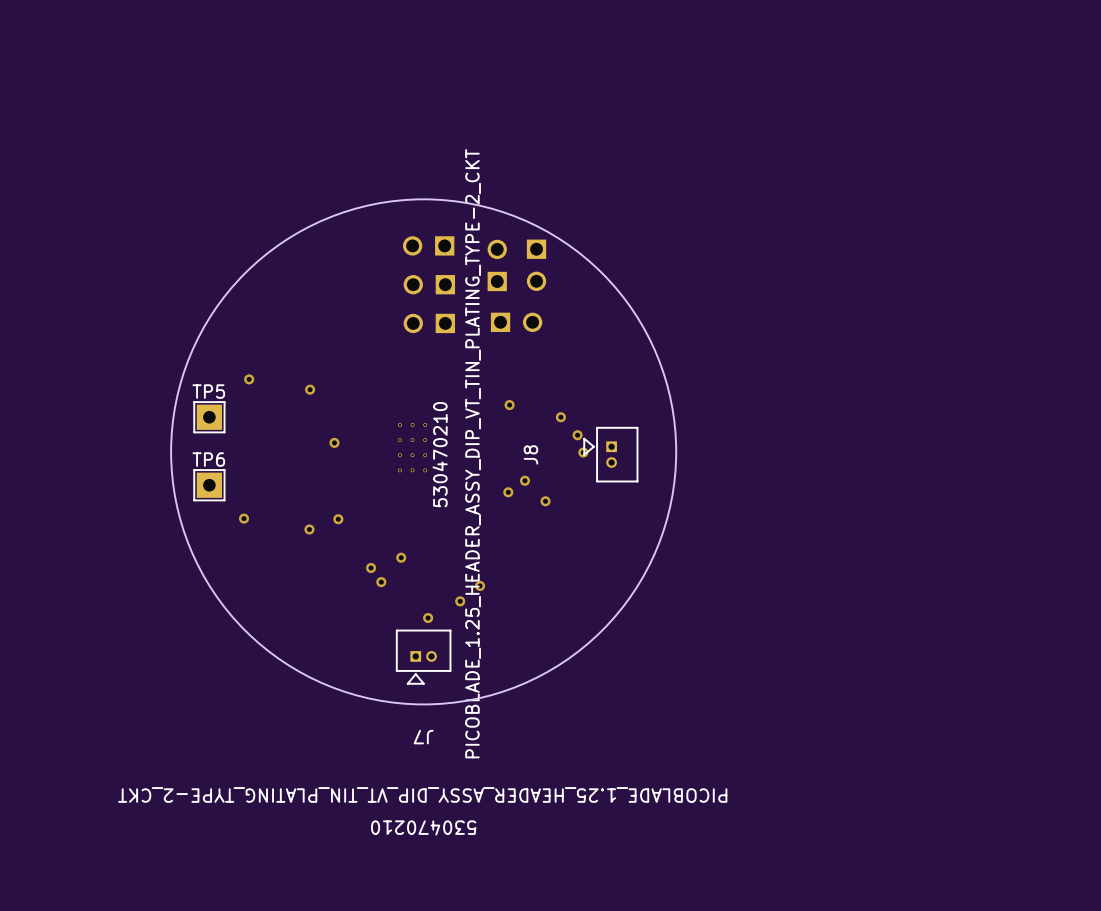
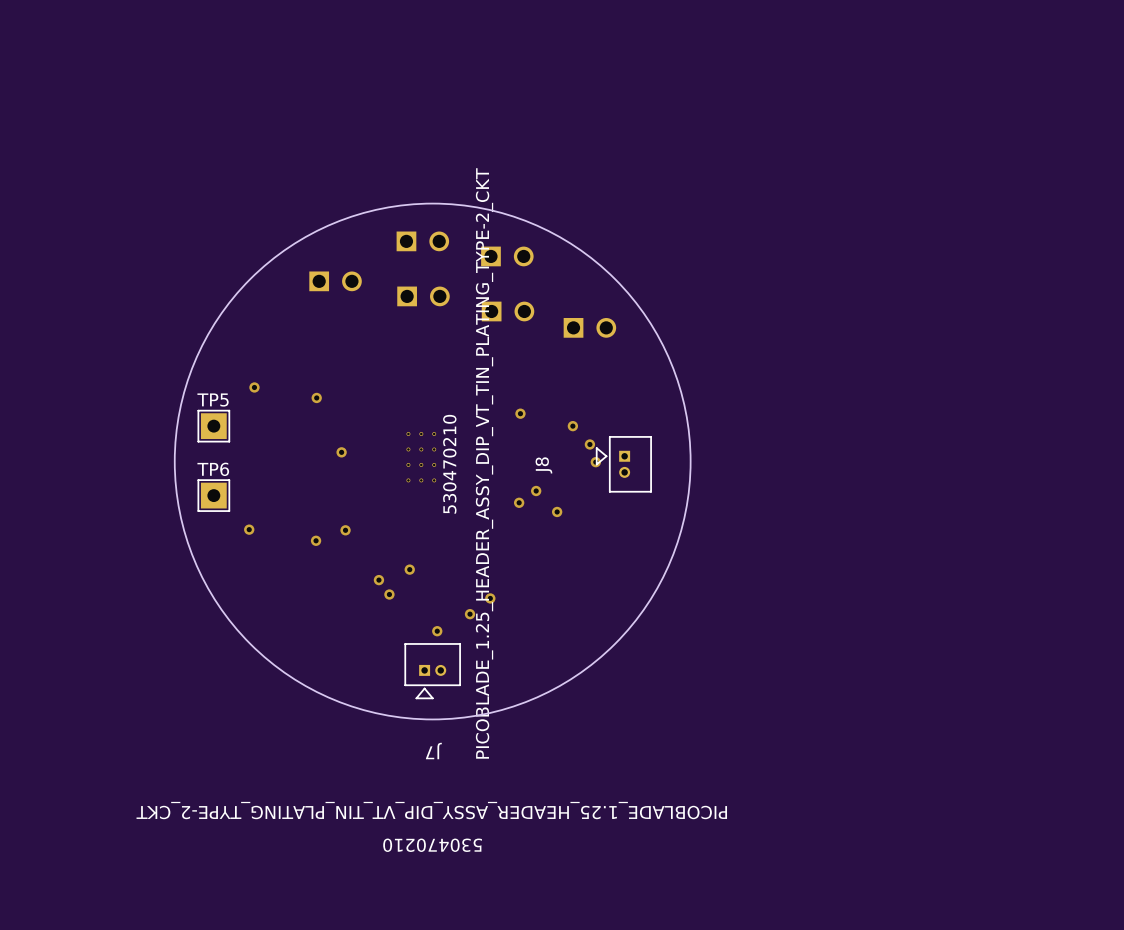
part rotation: 0° (428, 245) -> 180° (422, 241)
part rotation: 0° (497, 265) -> 90° clockwise (507, 256)
part: (536, 265) -> none
part: none -> (335, 281)
part rotation: 0° (429, 284) -> 180° (423, 296)
part: none -> (508, 311)
part: none -> (589, 327)
part: (516, 322) -> none
part: (429, 323) -> none

